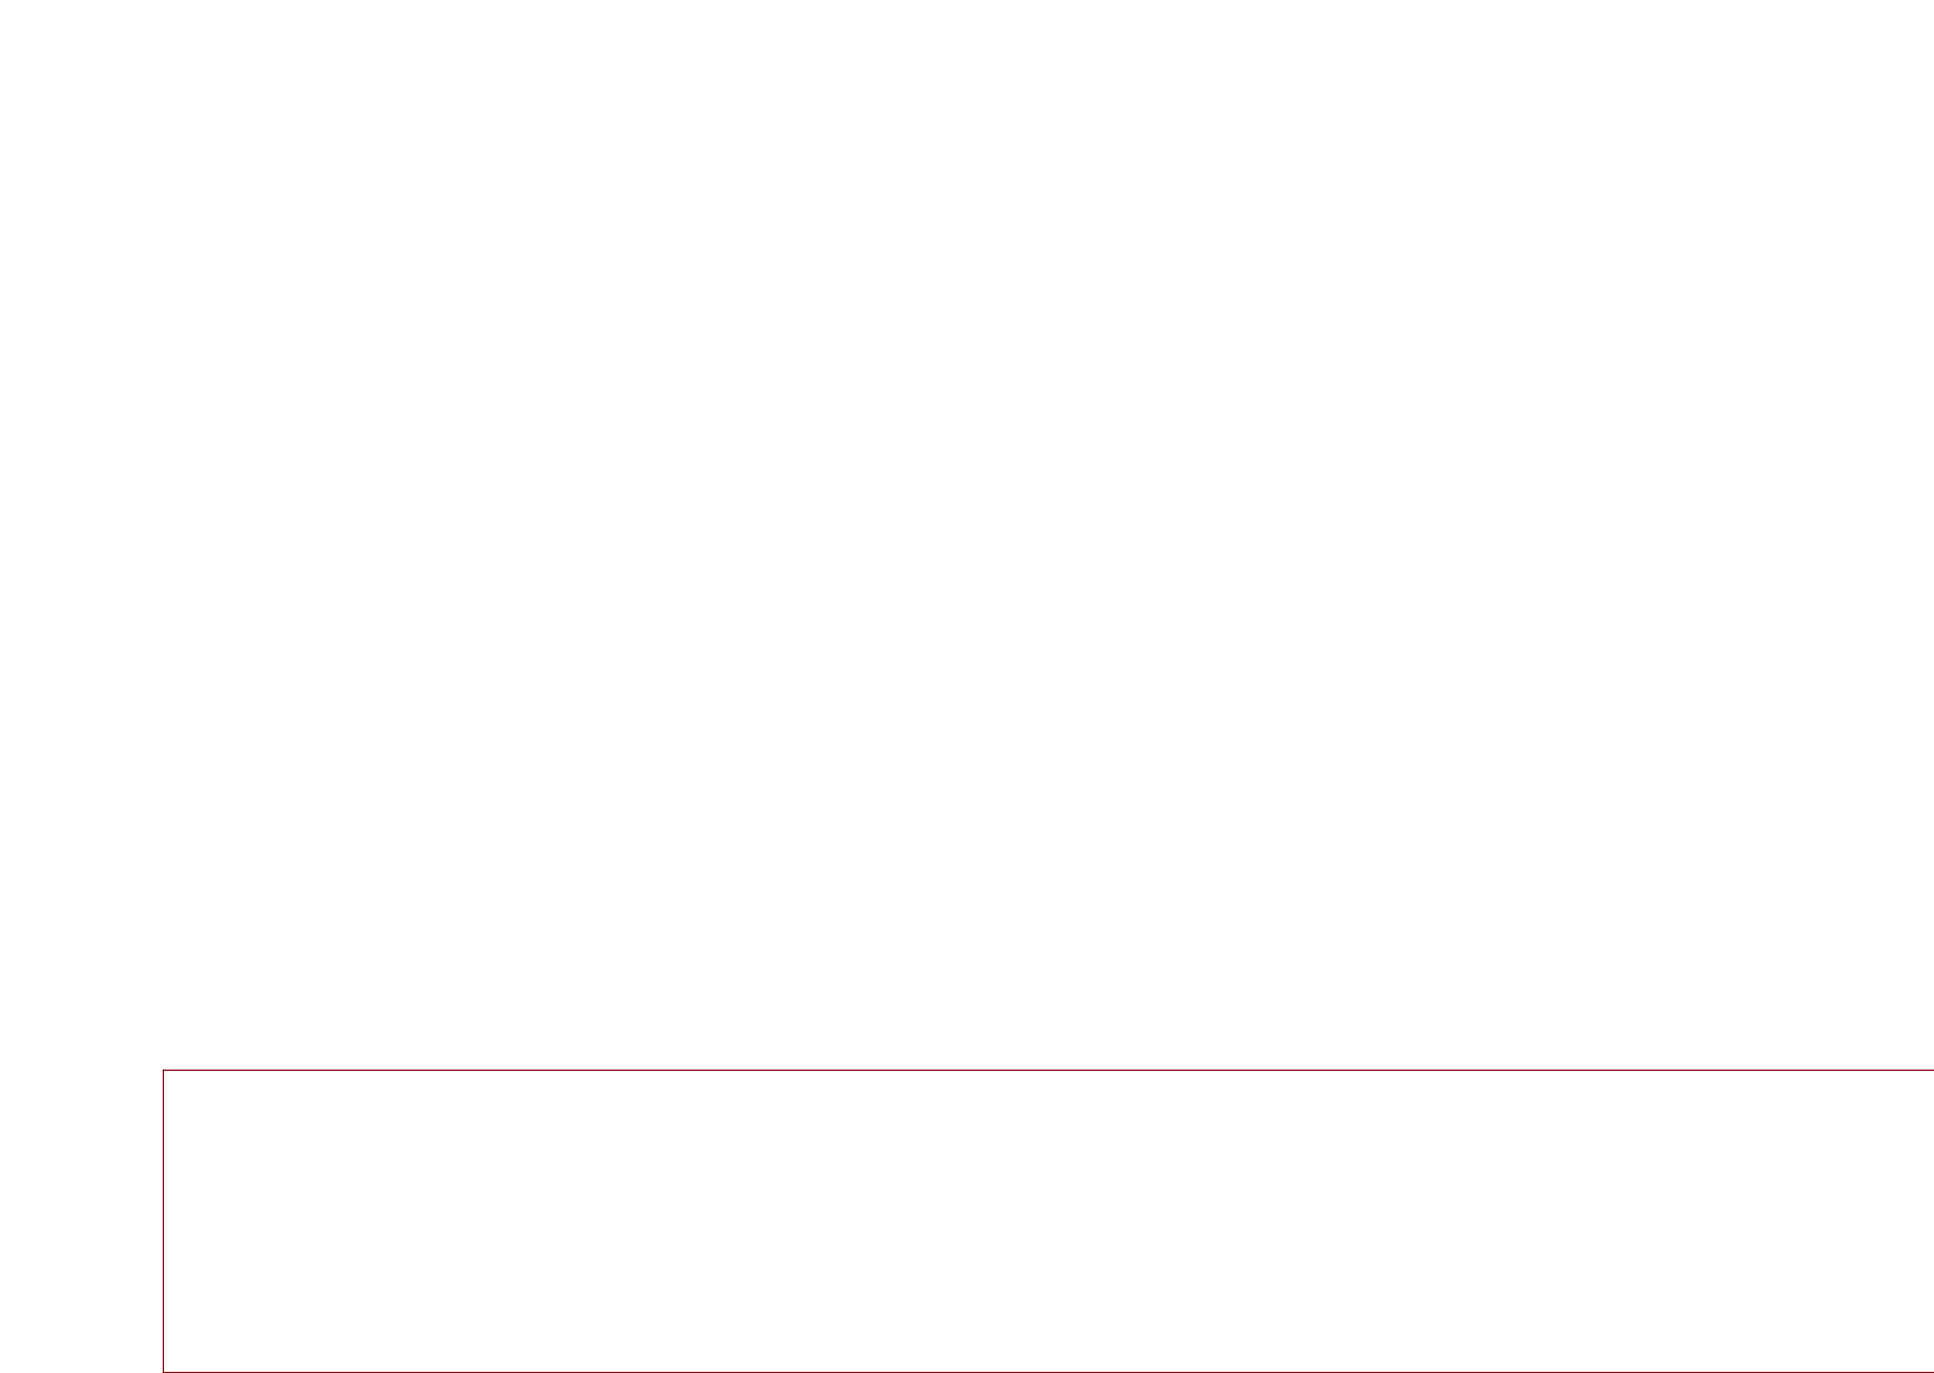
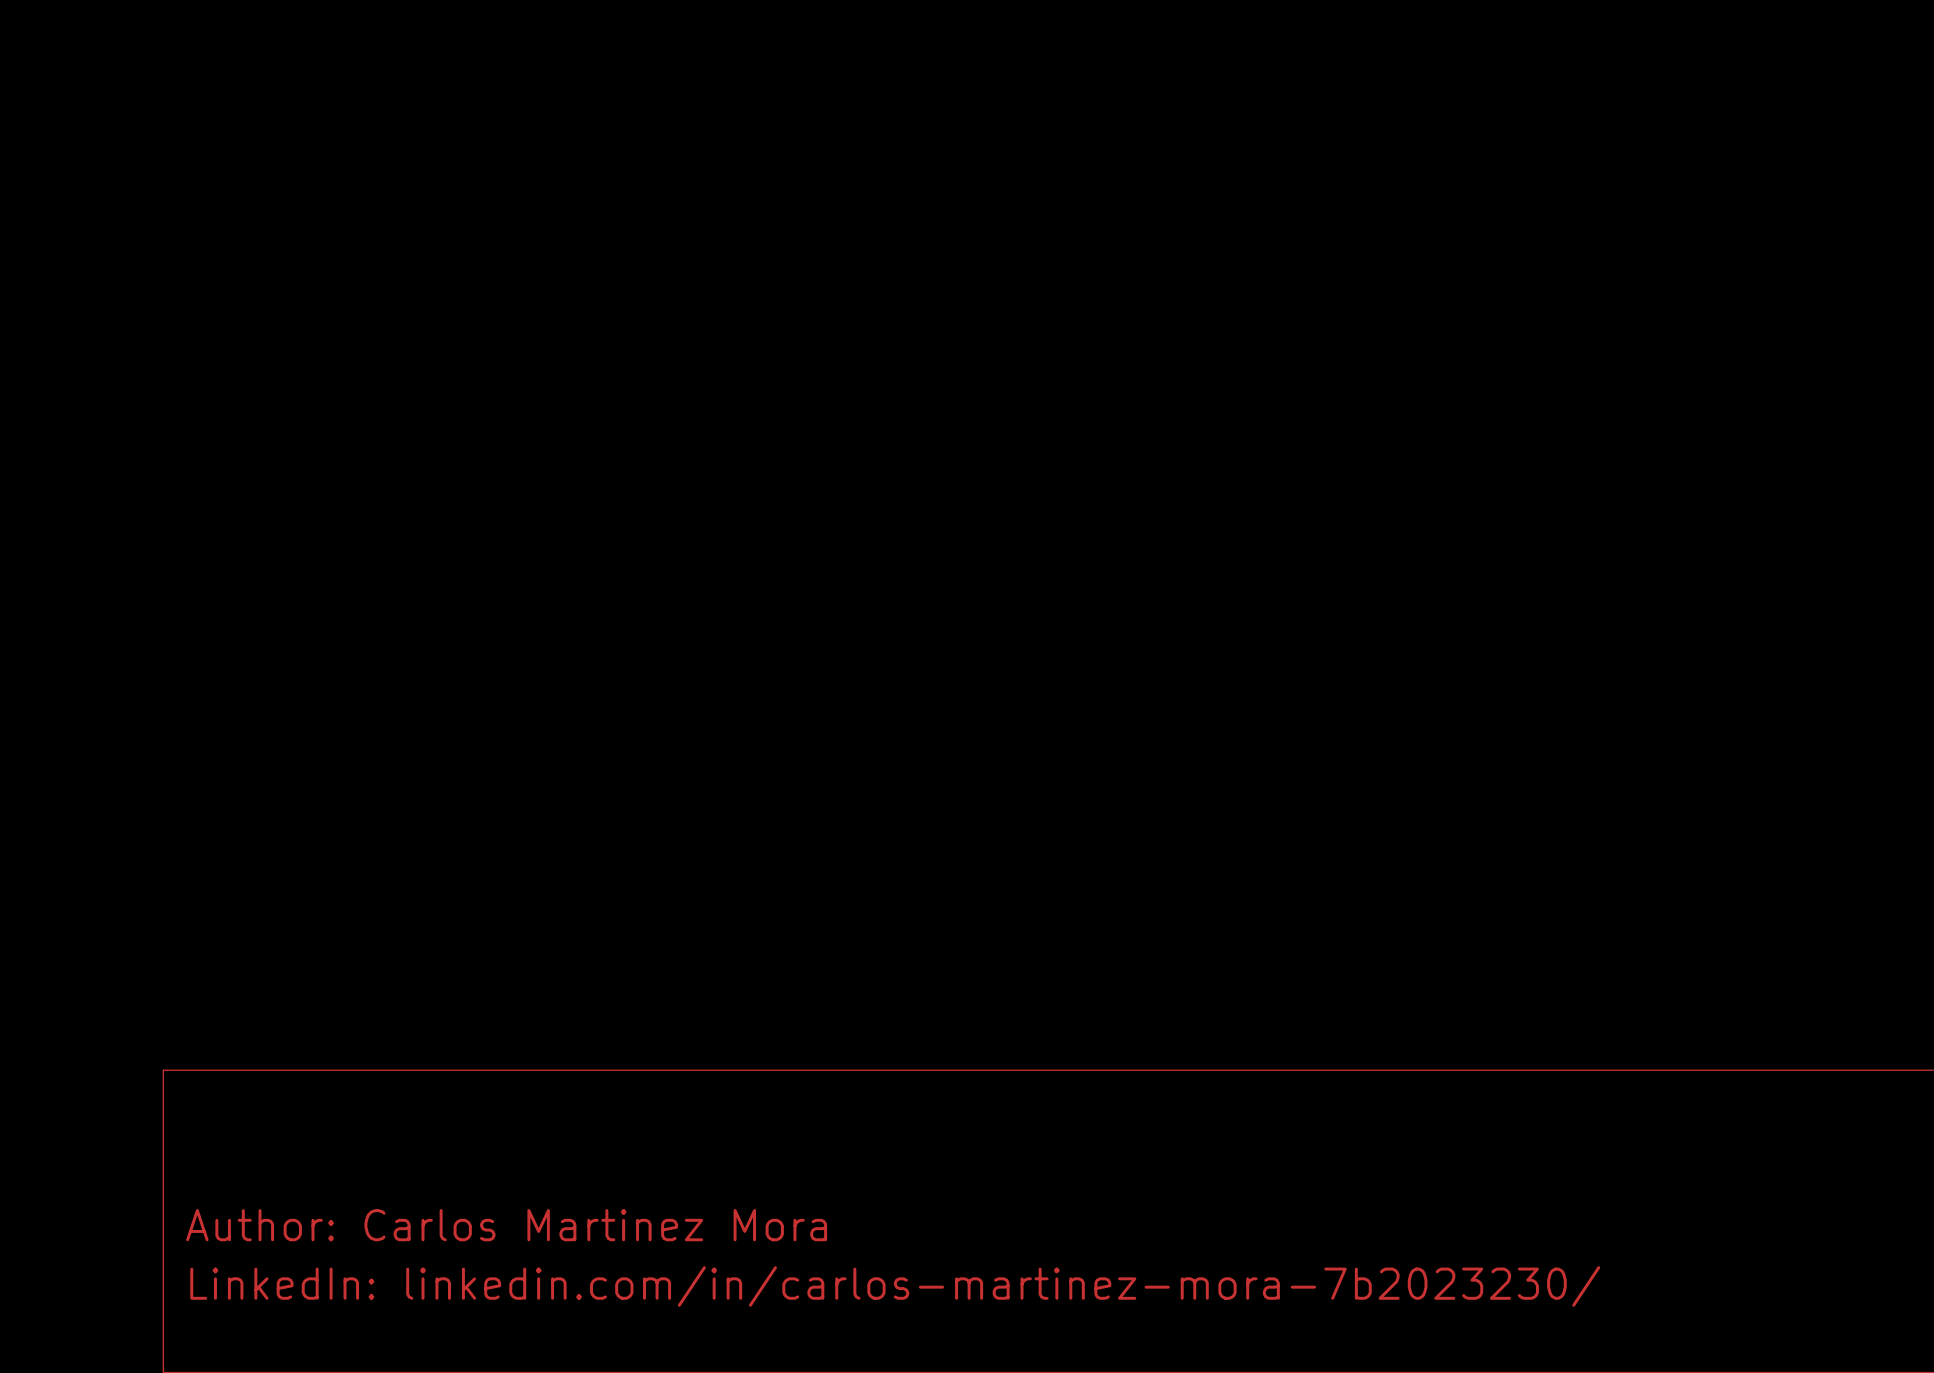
title block: none -> Author: Carlos Martinez Mora (506, 1225)
title block: none -> LinkedIn: linkedin.com/in/carlos-martinez-mora-7b2023230/ (895, 1286)

